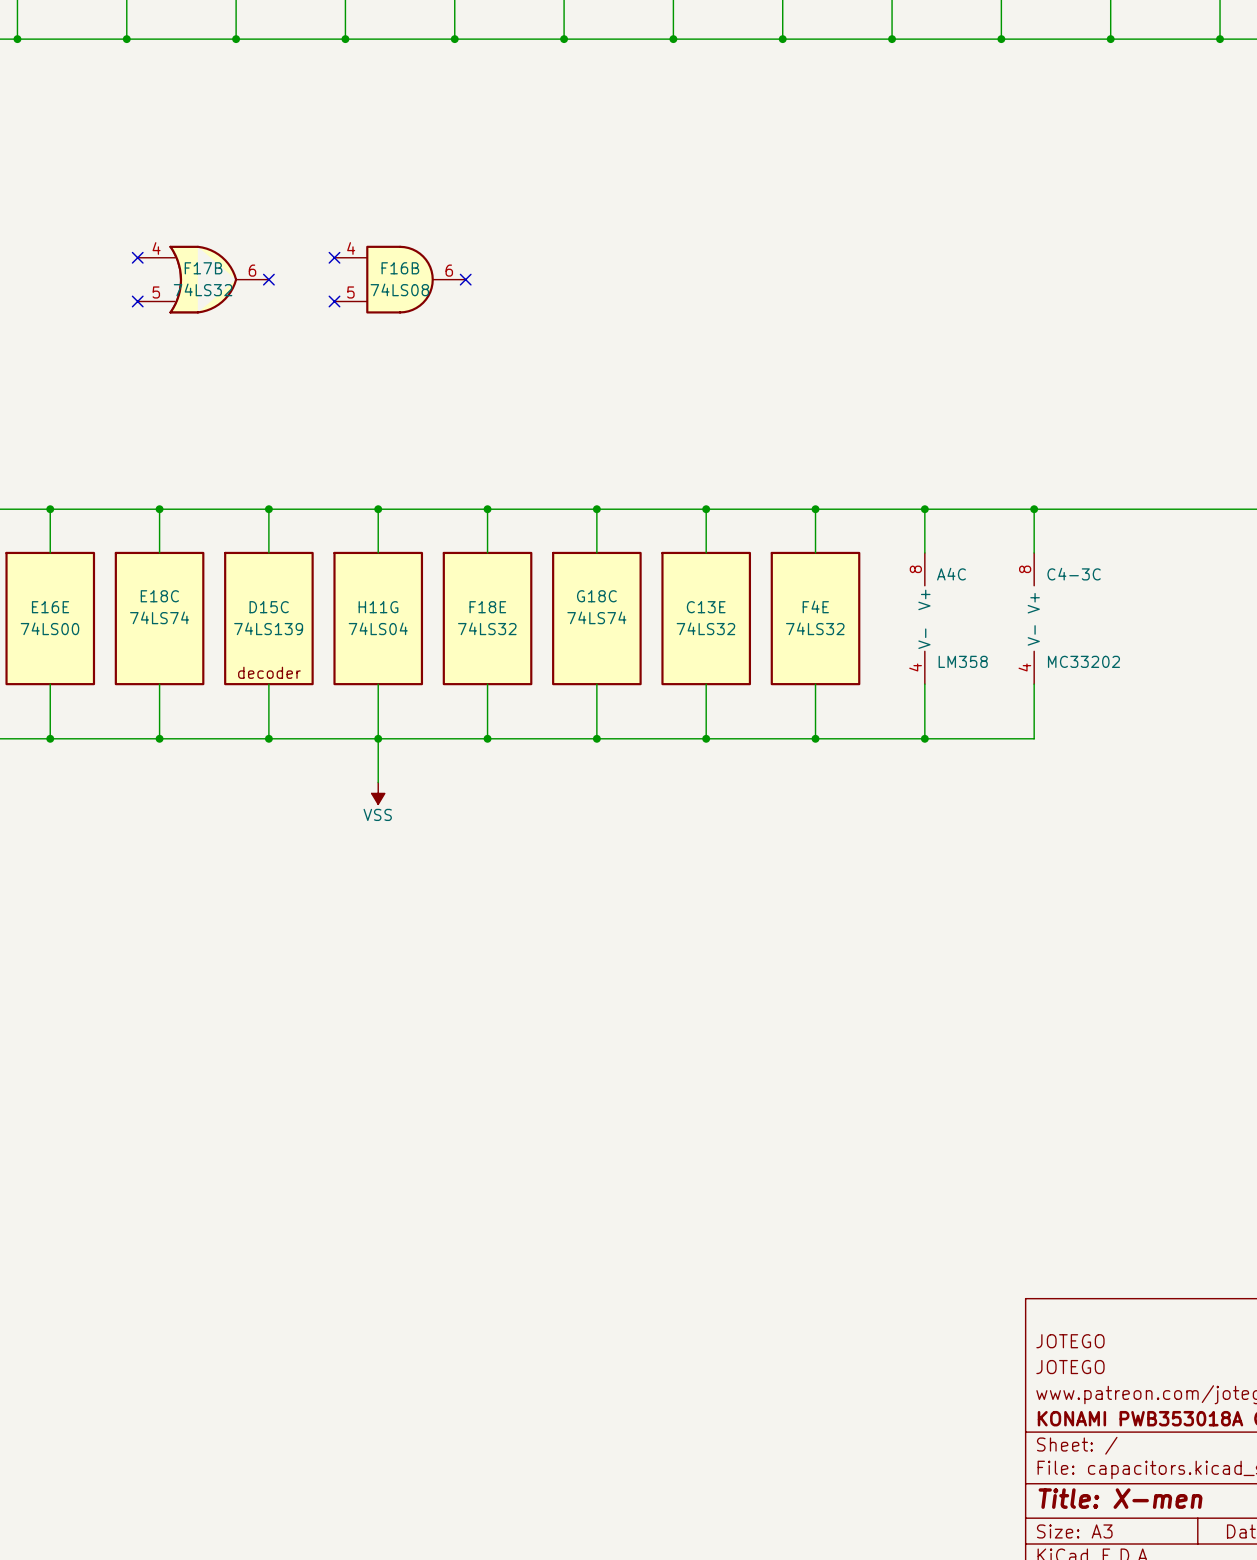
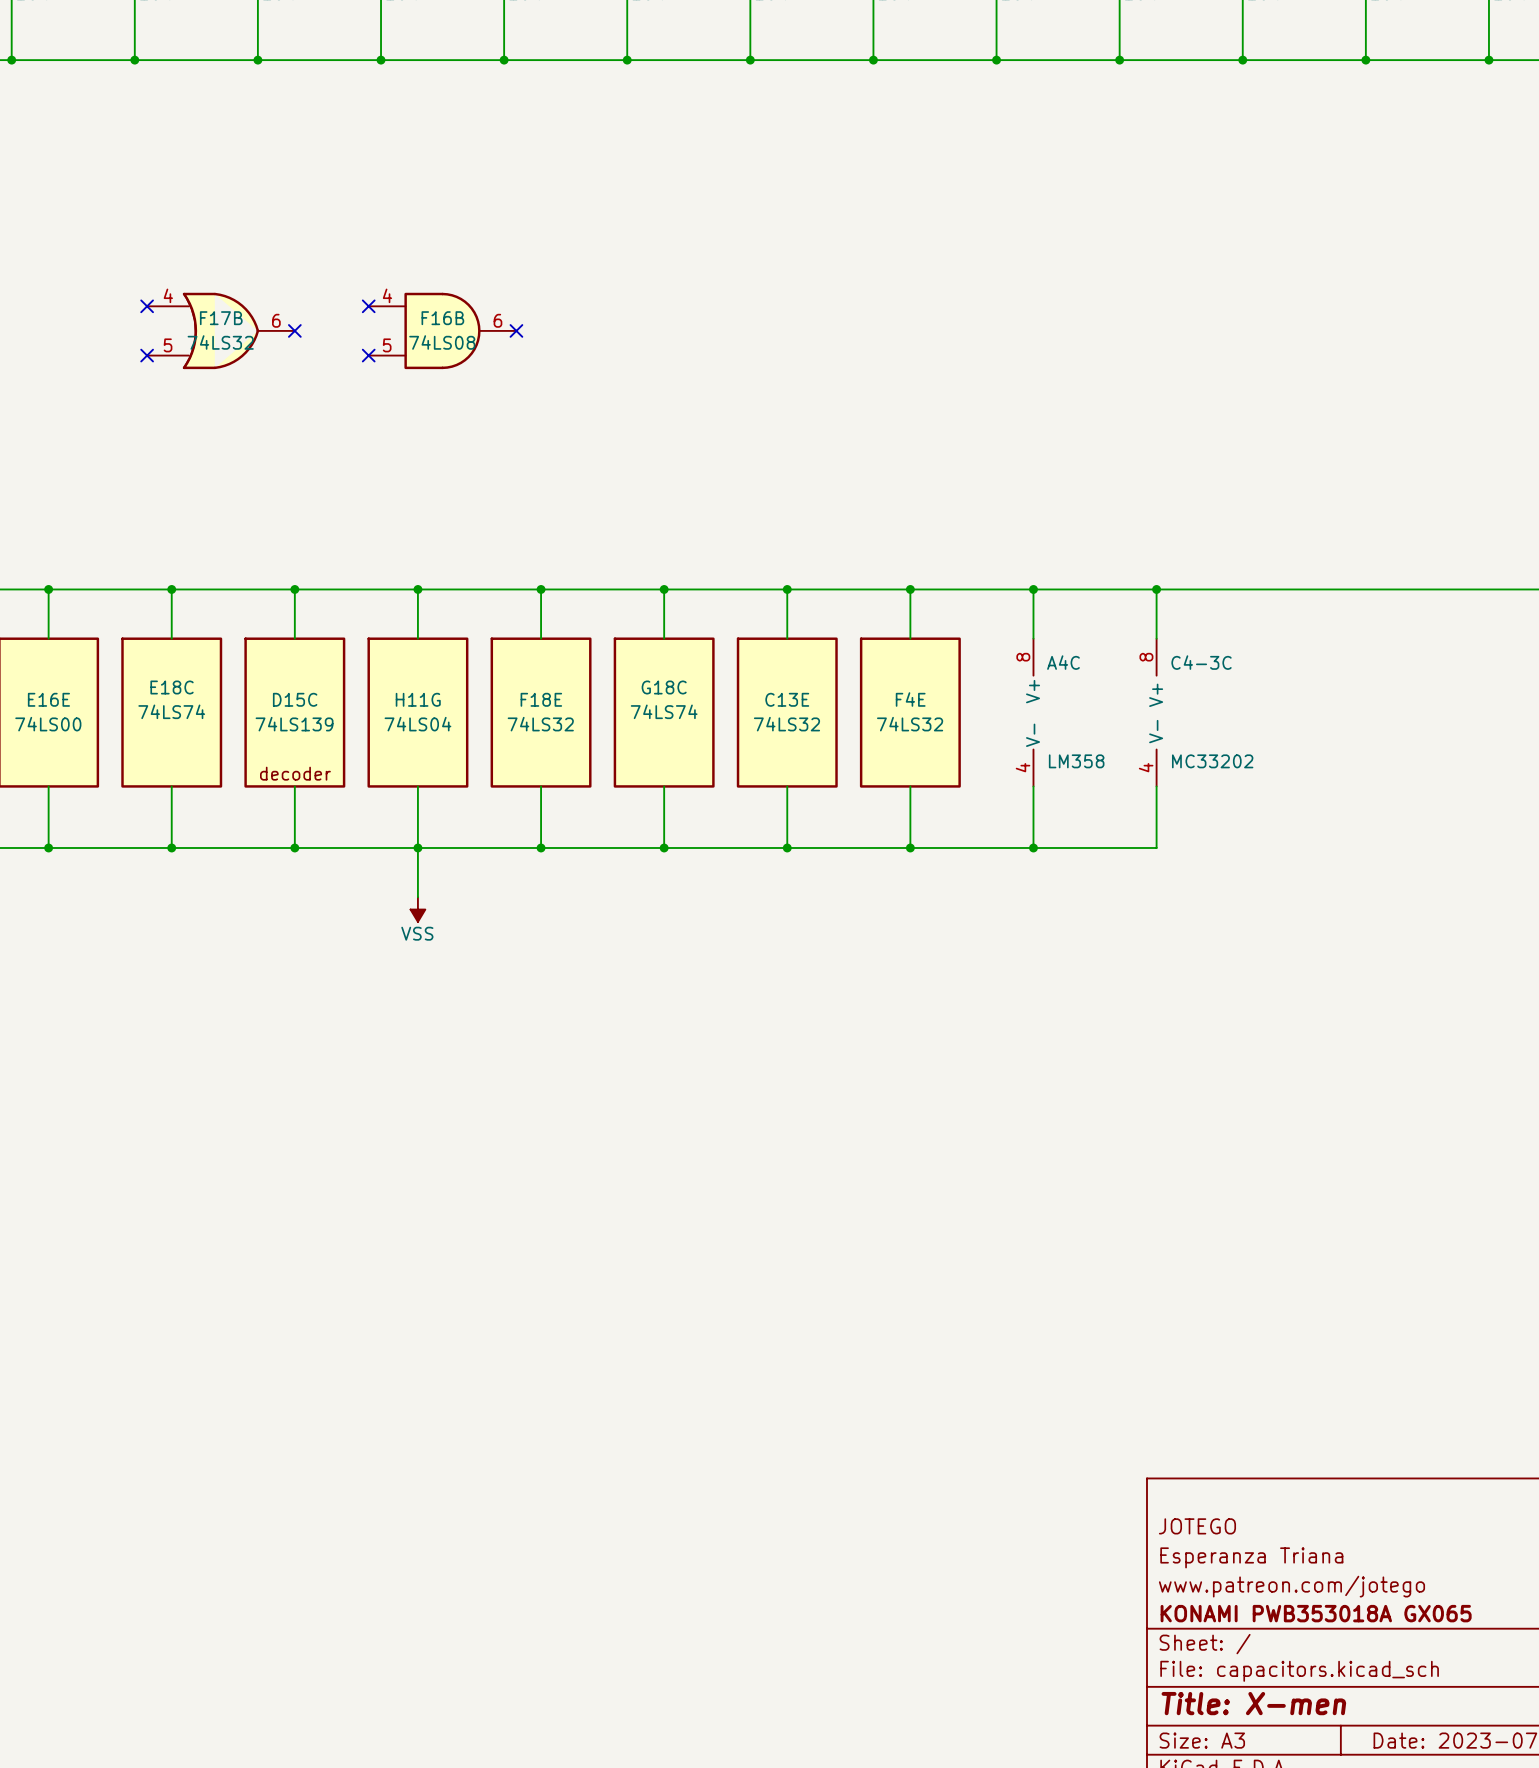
title block: JOTEGO (1070, 1367) -> Esperanza Triana (1251, 1557)

